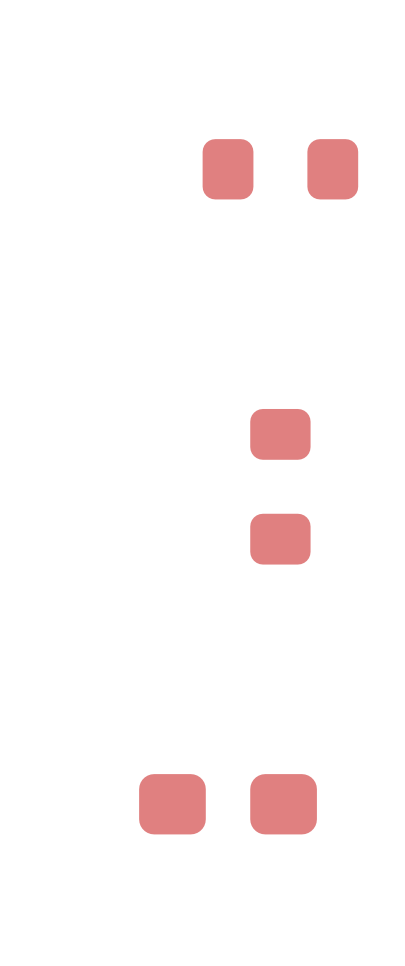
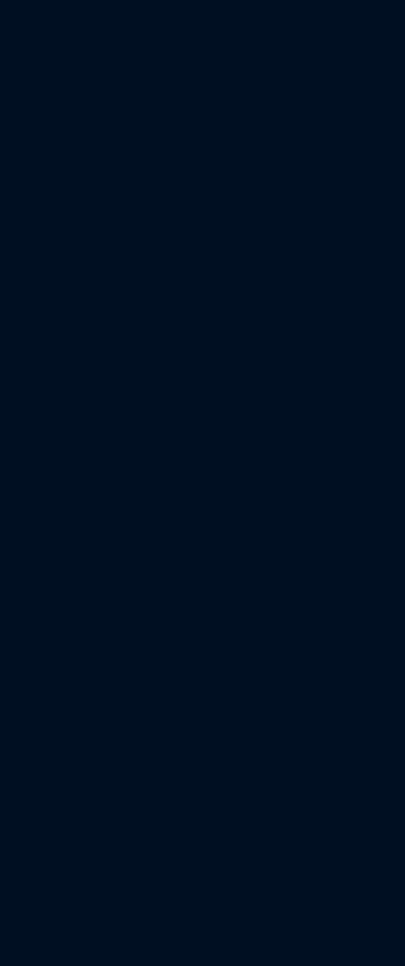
part: (280, 169) -> none
part: (280, 486) -> none
part: (228, 804) -> none

